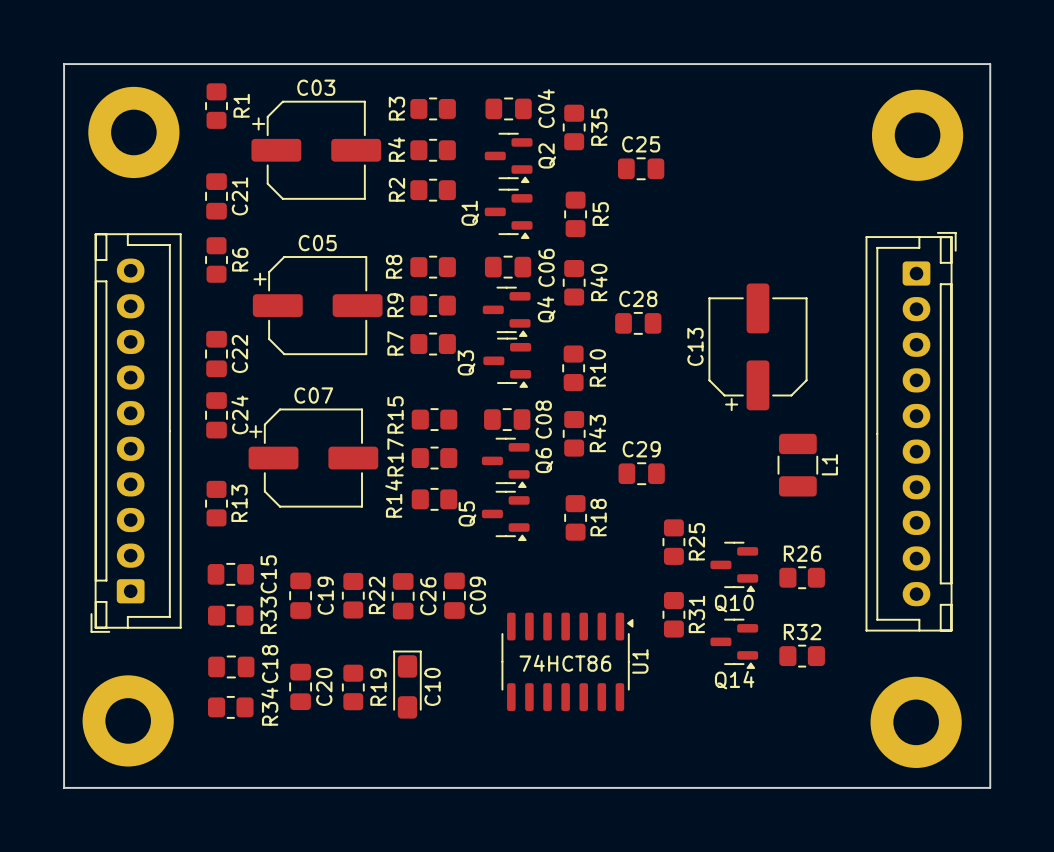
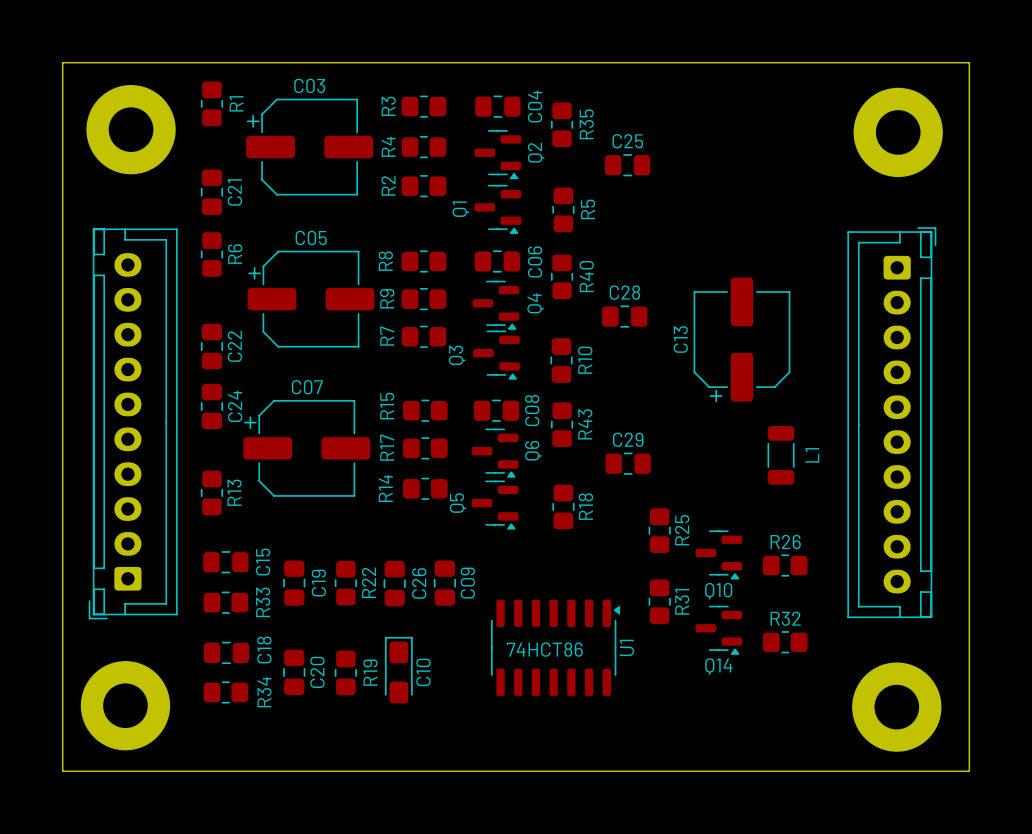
L1 footprint: [777, 433, 819, 497] -> [767, 426, 795, 485]

